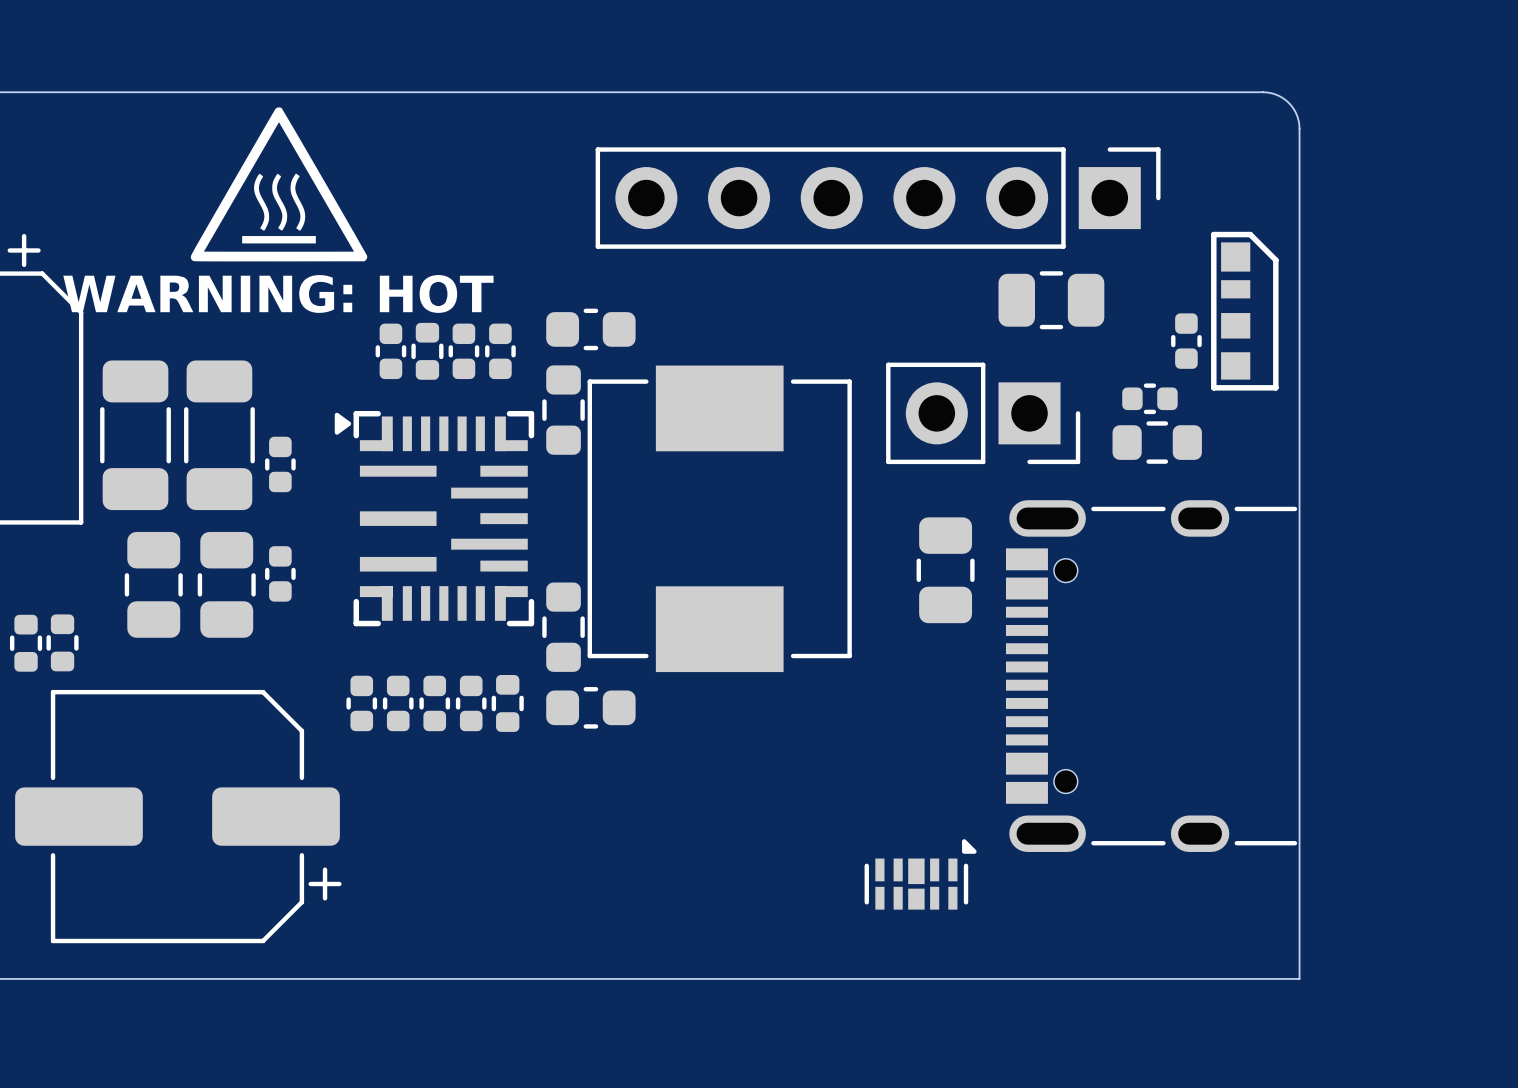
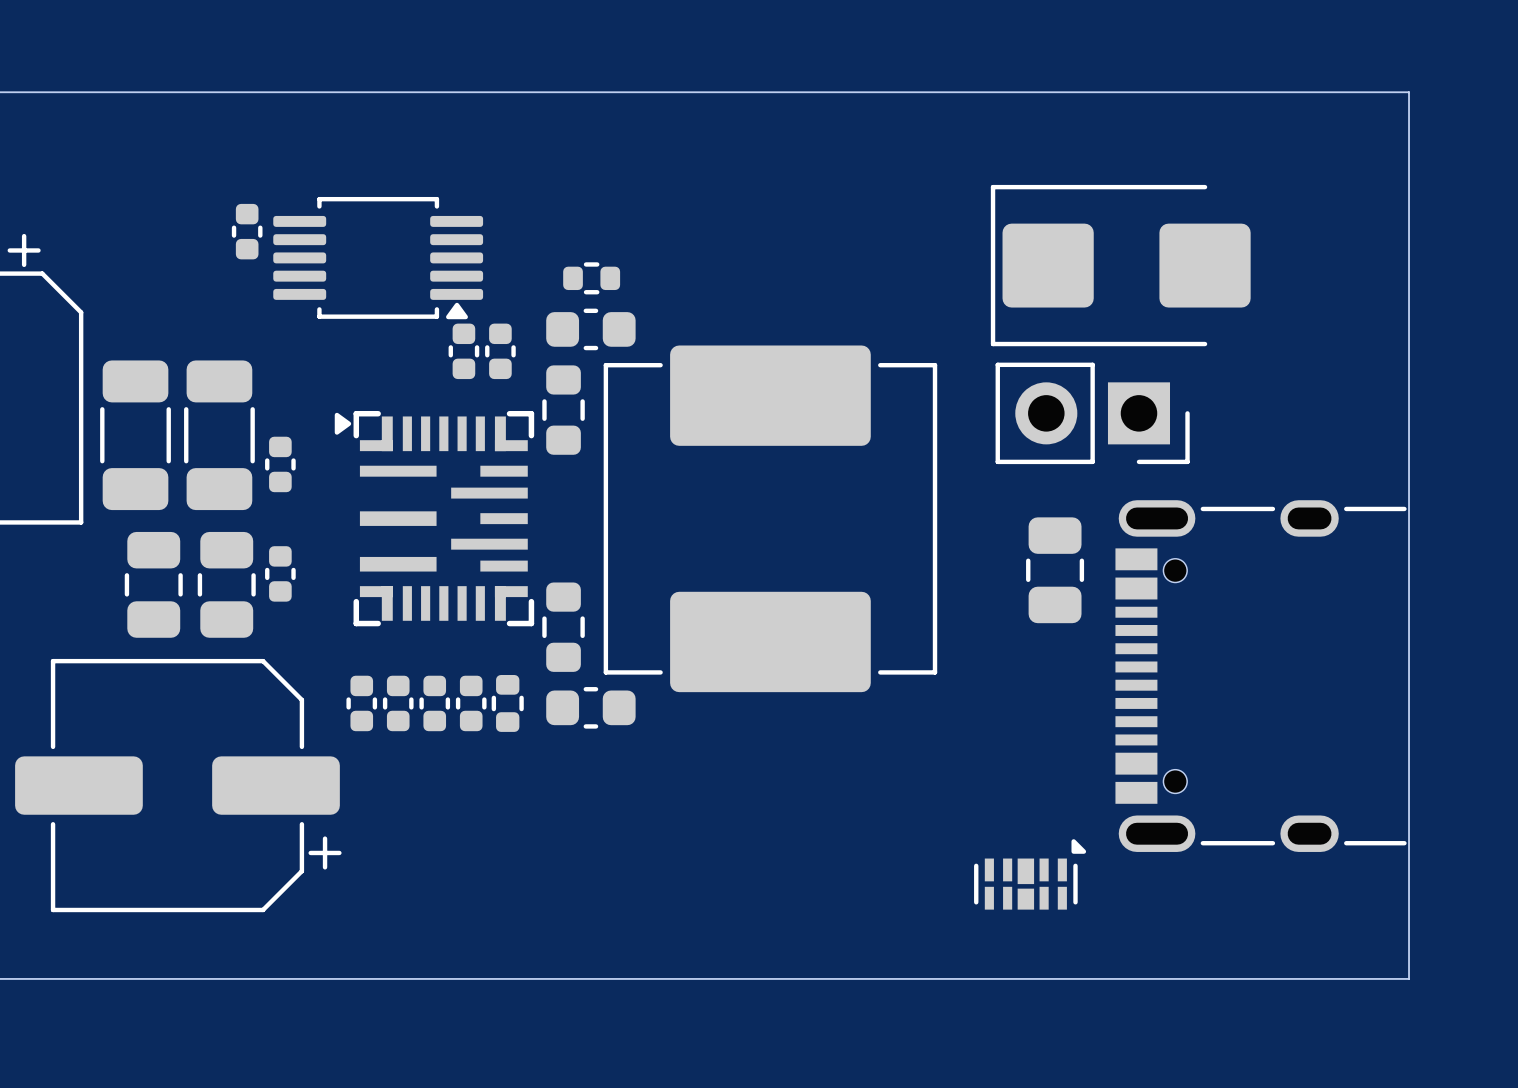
board edge: (1263, 92) (1275, 94) (1288, 102) (1297, 116) (1299, 128) (1299, 978) -> (1263, 92) (1409, 92) (1409, 978) (1299, 978)
drawing: [190, 107, 368, 262] -> none
part: (878, 198) -> none
part: none -> (378, 258)
part: none -> (1120, 265)
text: WARNING: HOT (278, 293) -> none
part: (1051, 300) -> none
part: (1244, 311) -> none
part: (1186, 341) -> none
part position: (390, 351) -> (247, 231)
part rotation: 0° (427, 351) -> 90° clockwise (591, 278)
part position: (427, 351) -> (591, 278)
part: (1149, 398) -> none
part position: (983, 413) -> (1092, 413)
part: (1157, 442) -> none
part: (719, 518) -> none
part: none -> (770, 518)
part position: (945, 570) -> (1055, 570)
part: (62, 642) -> none
part: (26, 643) -> none
part position: (1151, 676) -> (1261, 676)
part position: (178, 816) -> (178, 785)
part position: (920, 874) -> (1030, 874)

